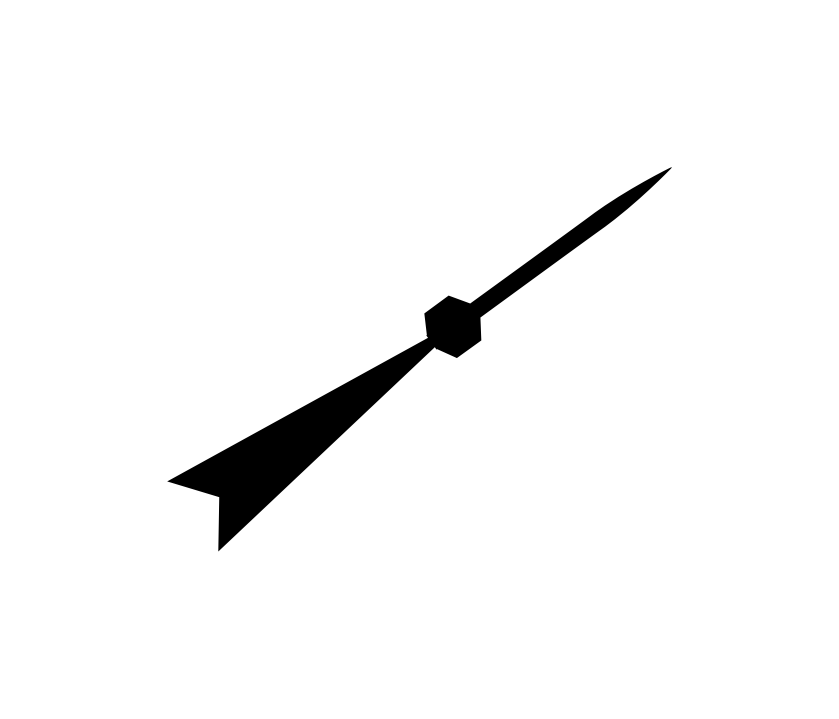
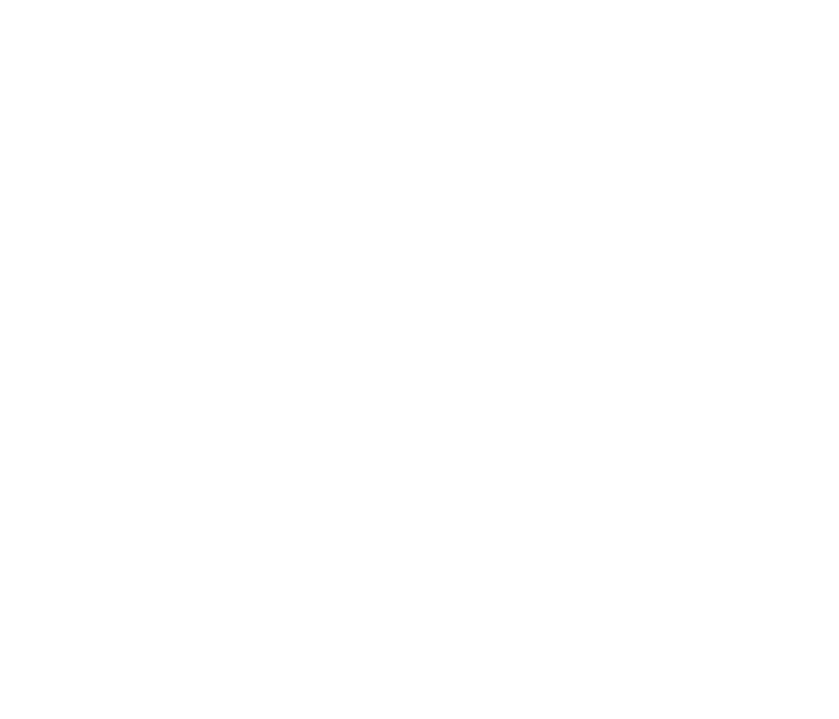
drawing: [167, 167, 673, 552] -> none

